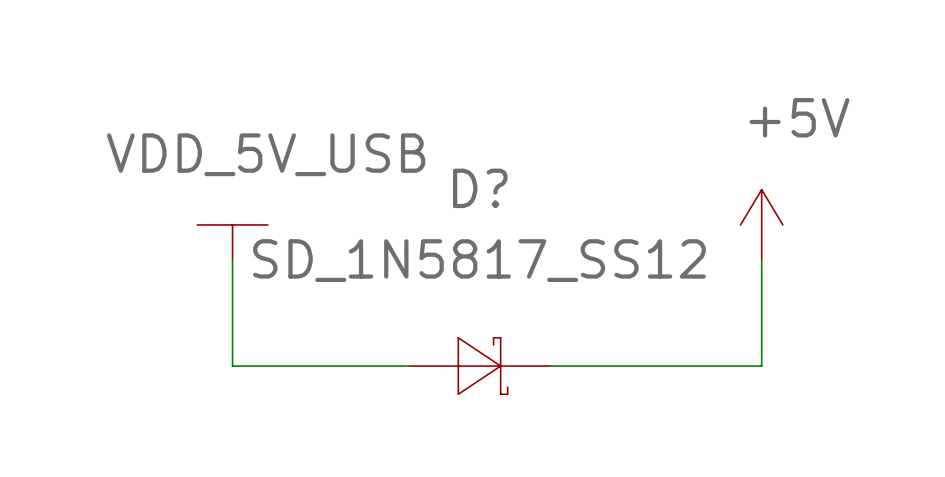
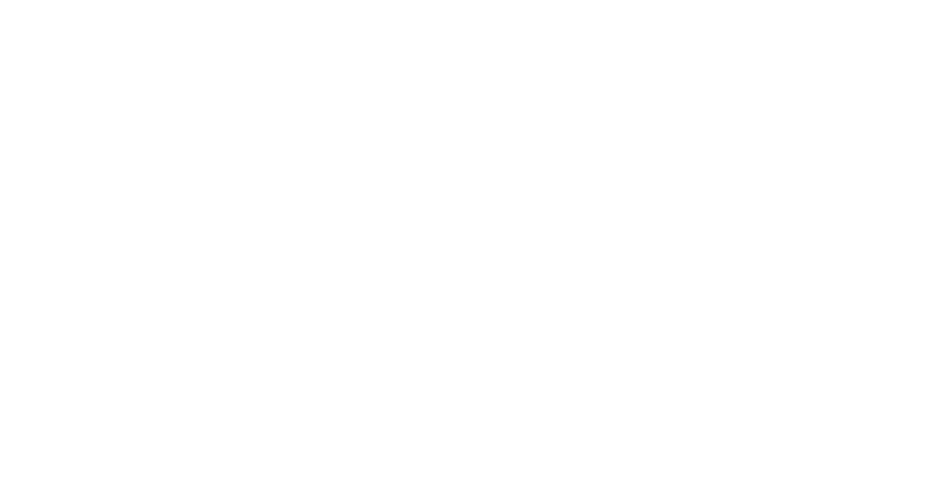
power symbol: +5V (761, 224) -> none
power symbol: VDD_5V_USB (232, 242) -> none
wire: (232, 260) (232, 366) (408, 366) -> none
wire: (761, 260) (761, 366) (550, 366) -> none
D?: SD_1N5817_SS12 (479, 366) -> none

